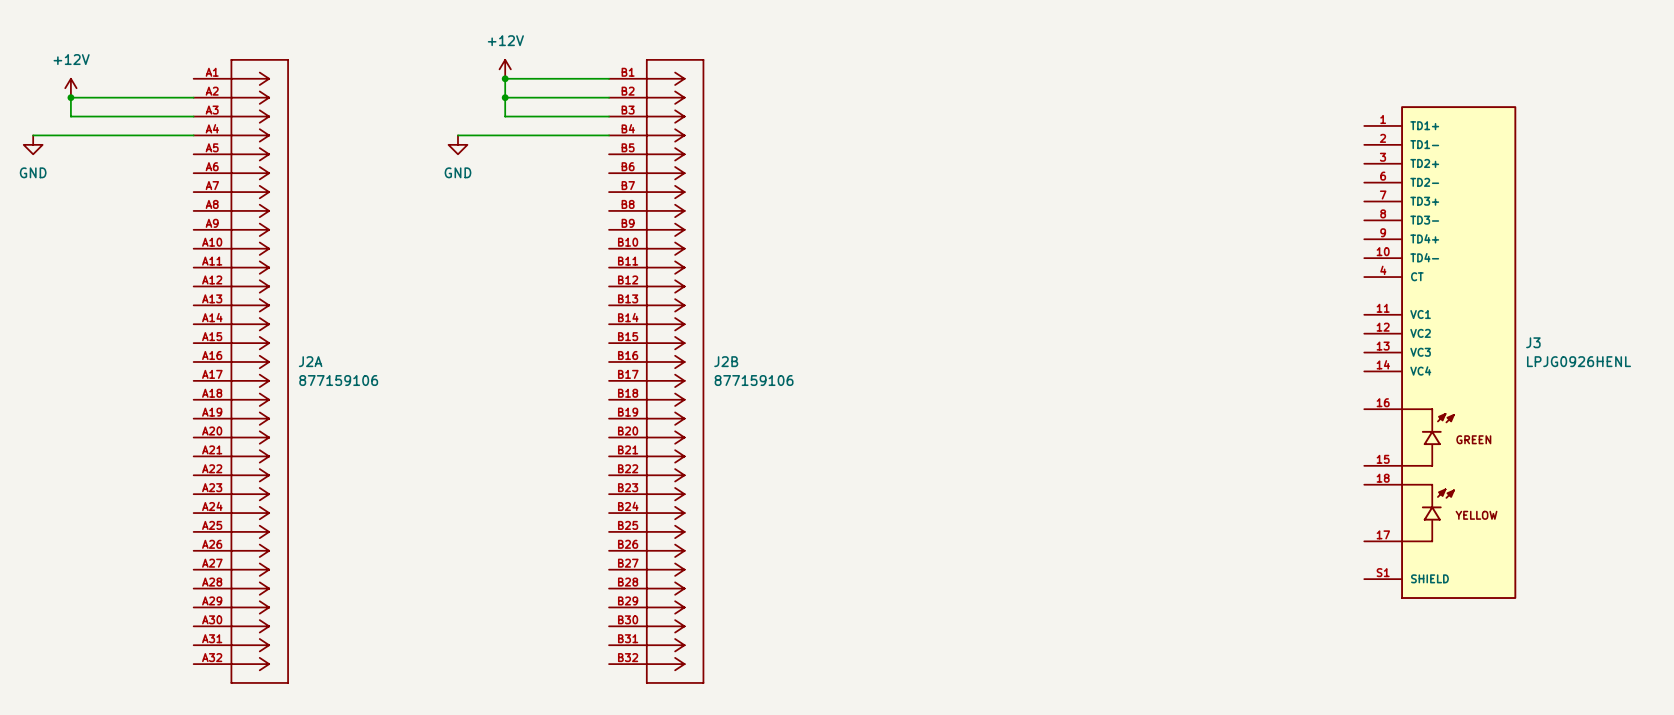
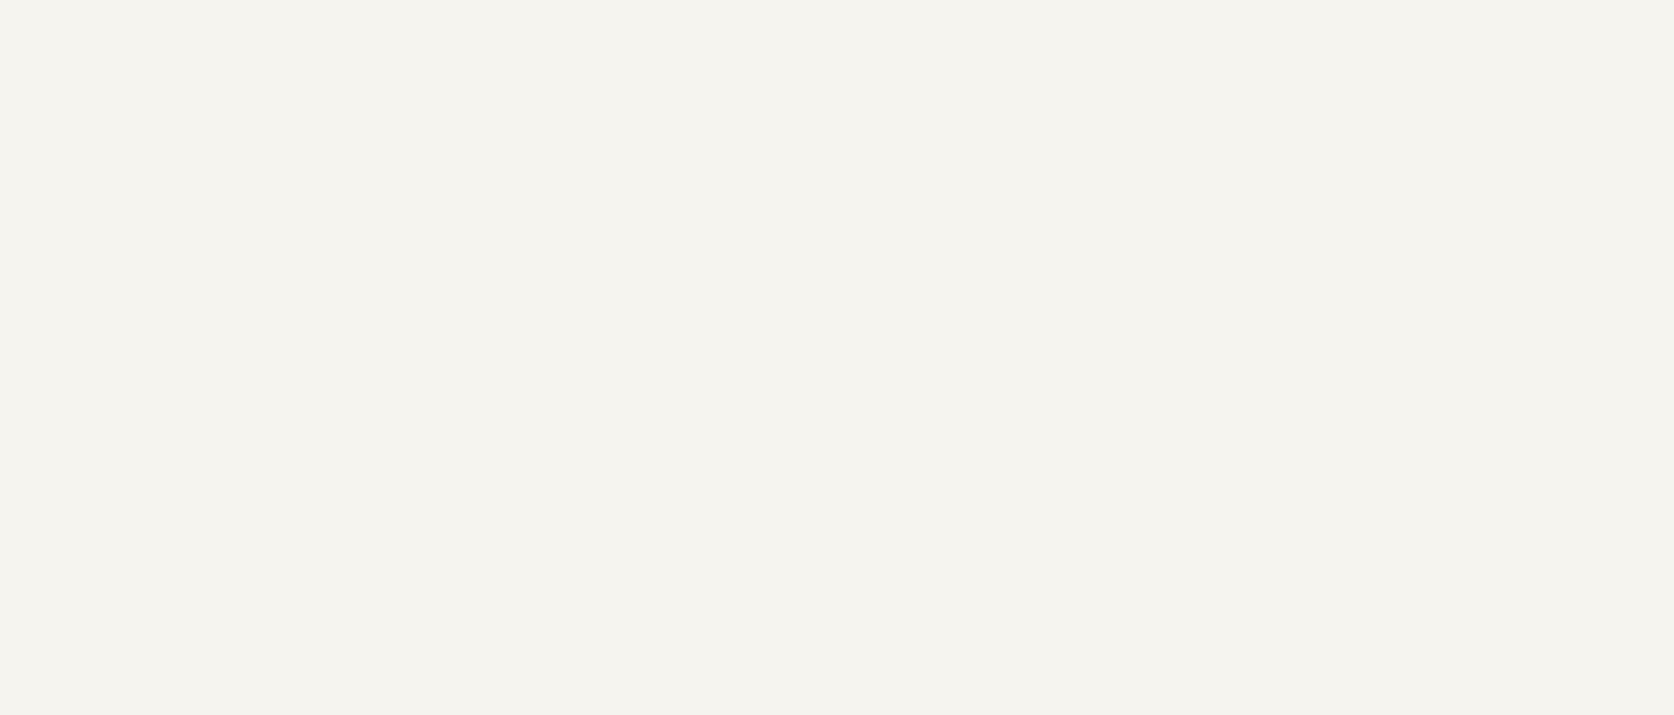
power symbol: +12V (505, 69) -> none
junction: (505, 78) -> none
wire: (609, 78) (505, 78) (505, 116) (609, 116) -> none
power symbol: +12V (70, 88) -> none
junction: (70, 97) -> none
wire: (193, 97) (70, 97) (70, 116) (193, 116) -> none
wire: (505, 97) (609, 97) -> none
junction: (505, 97) -> none
wire: (33, 135) (193, 135) -> none
wire: (457, 135) (609, 135) -> none
power symbol: GND (33, 144) -> none
power symbol: GND (457, 144) -> none
J3: LPJG0926HENL (1440, 352) -> none
J2A: 877159106 (241, 371) -> none
J2B: 877159106 (656, 371) -> none

